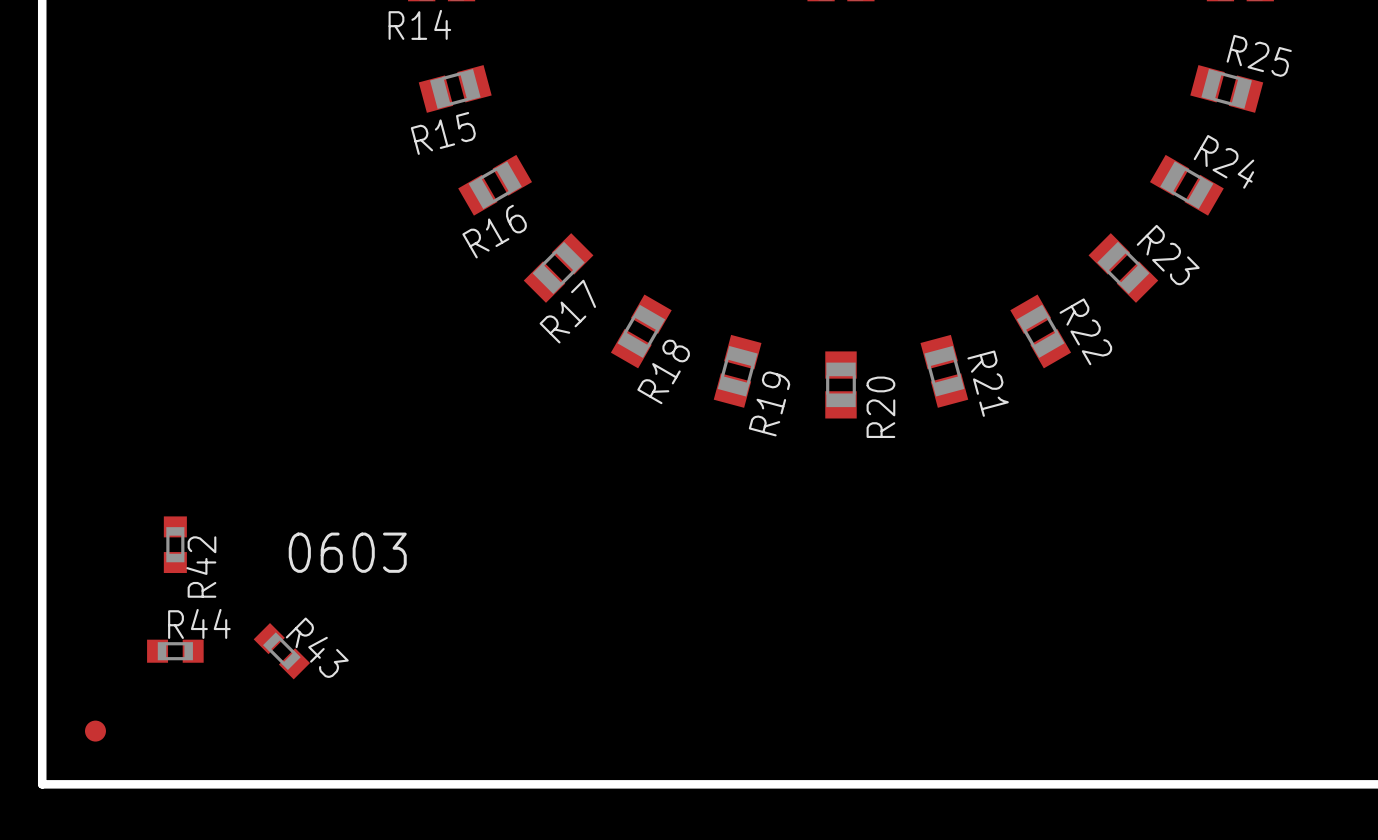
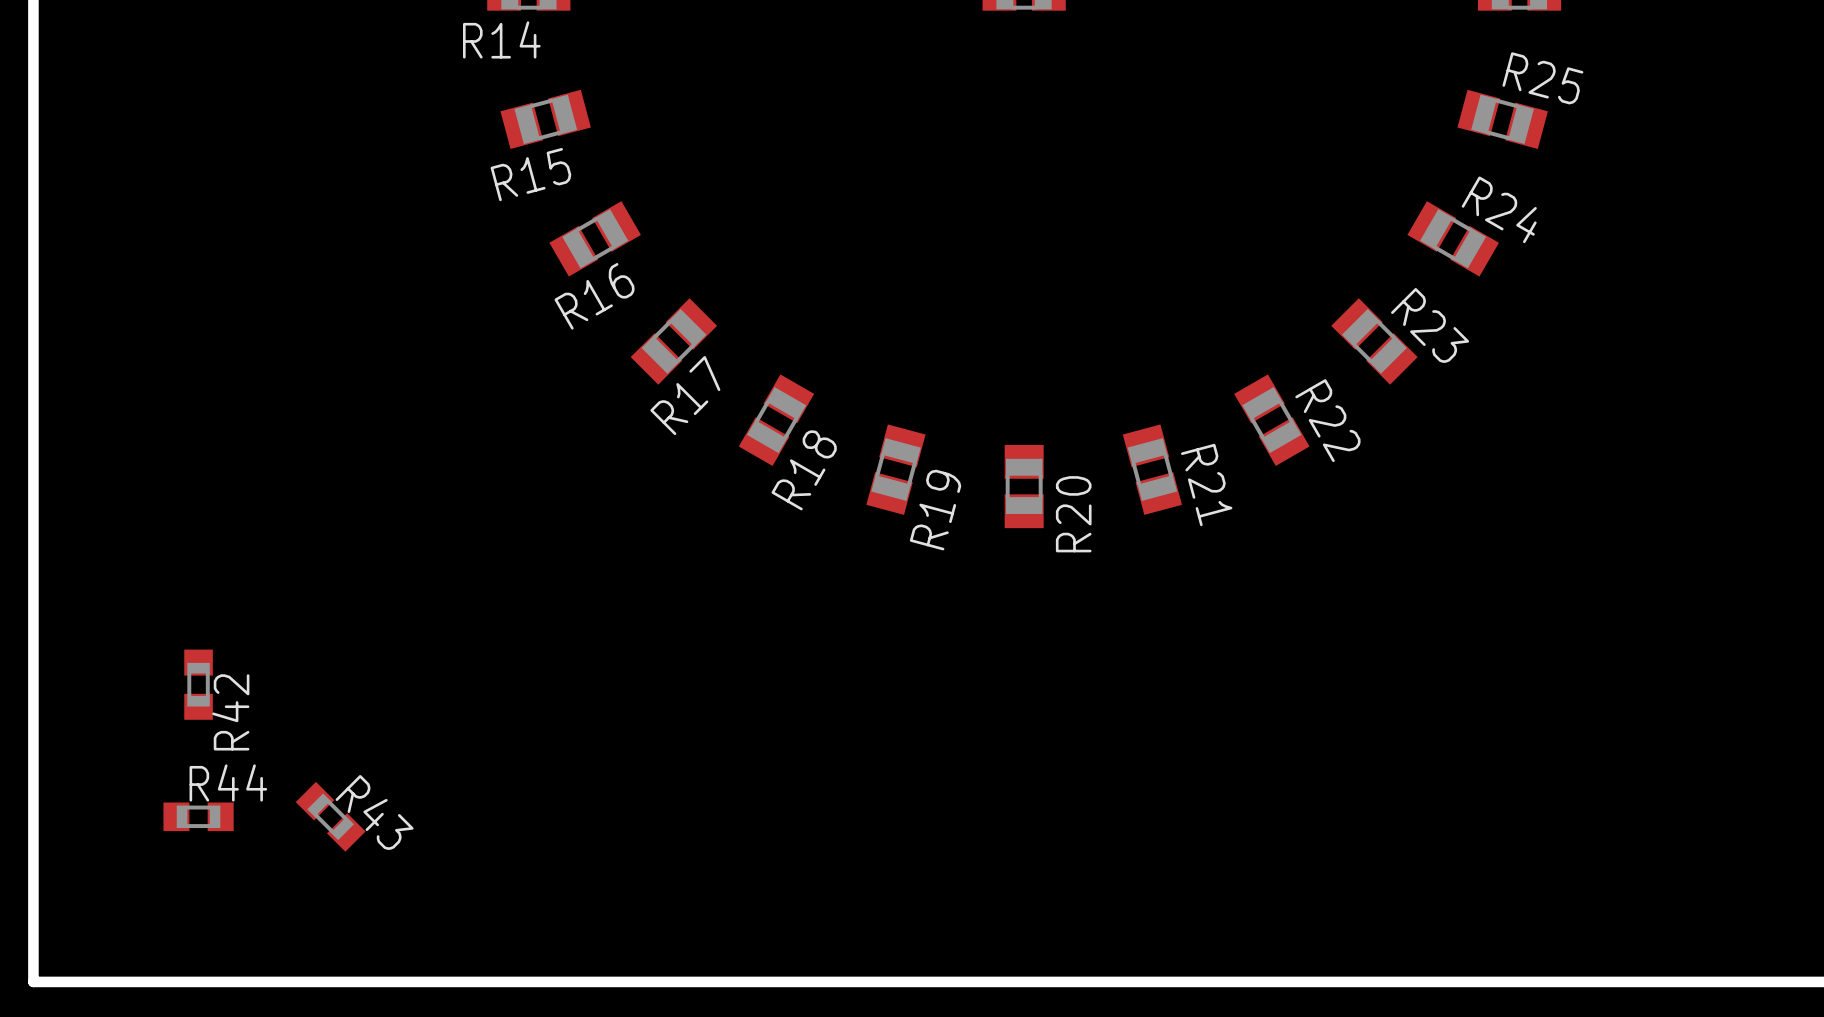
text: 0603 (347, 552) -> none
part: (95, 731) -> none

